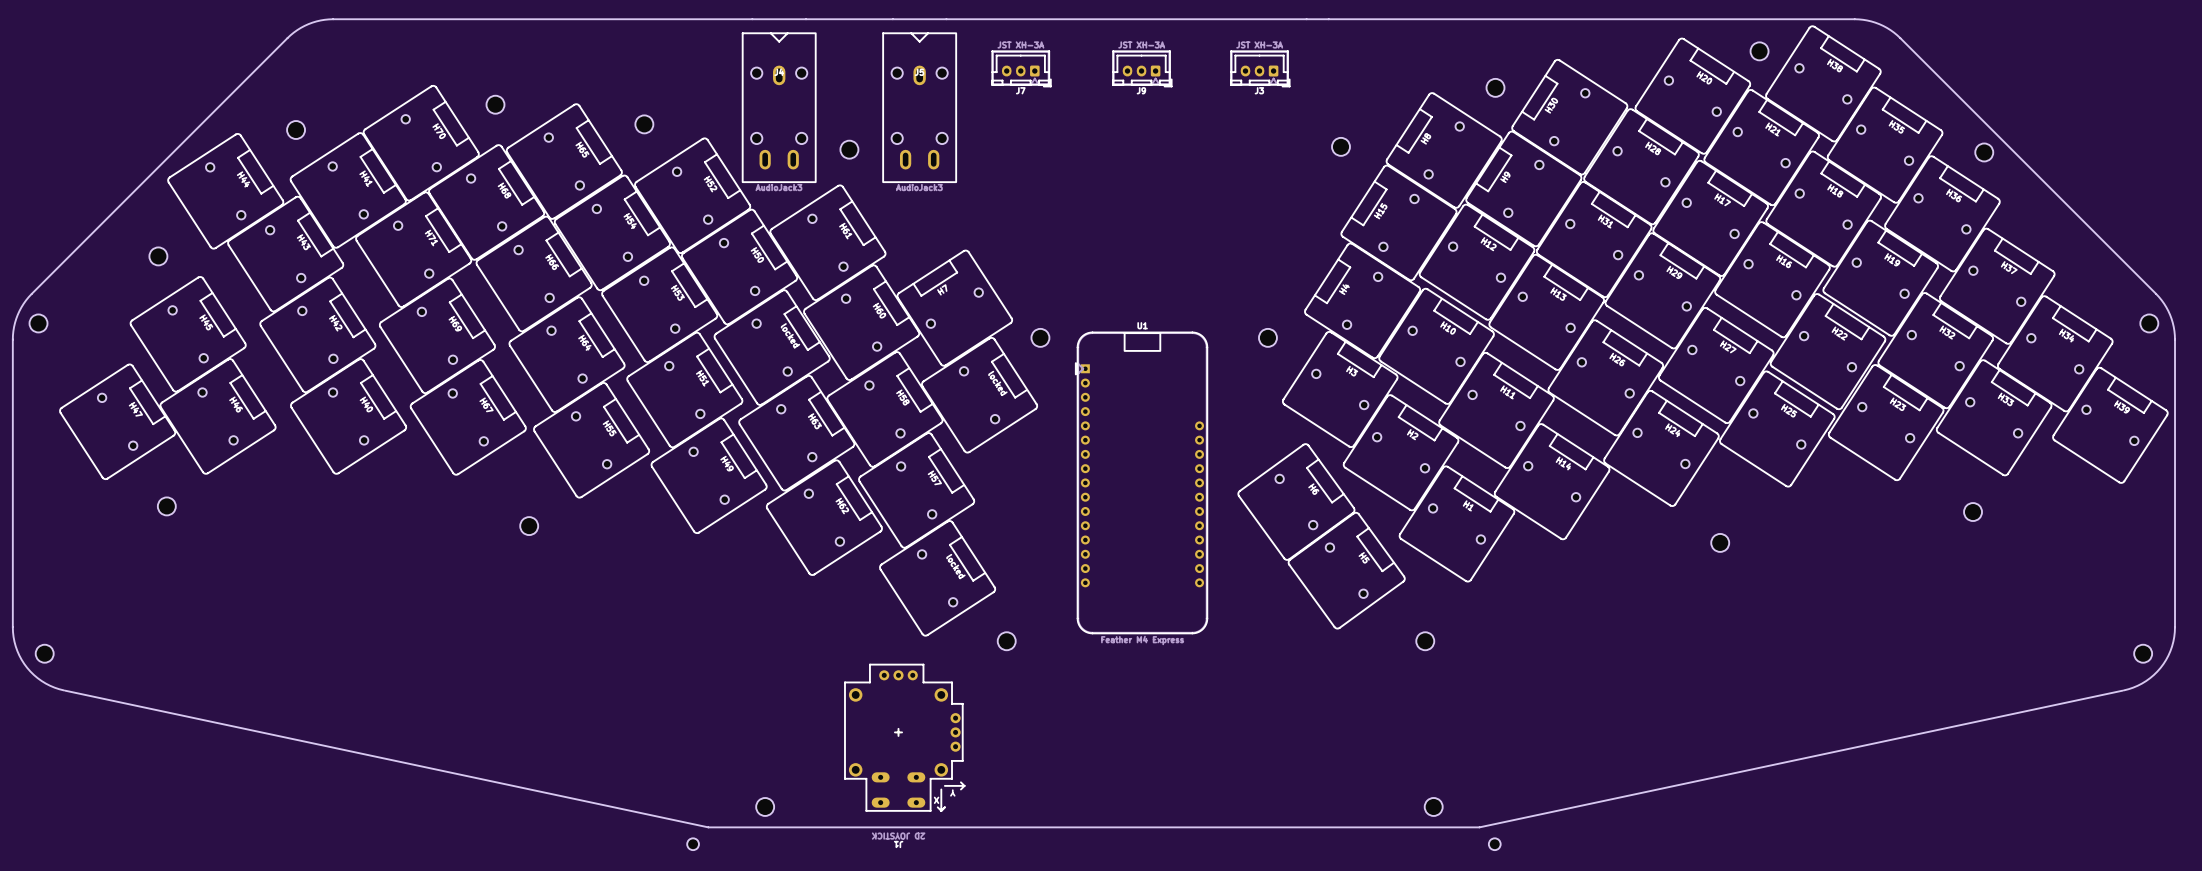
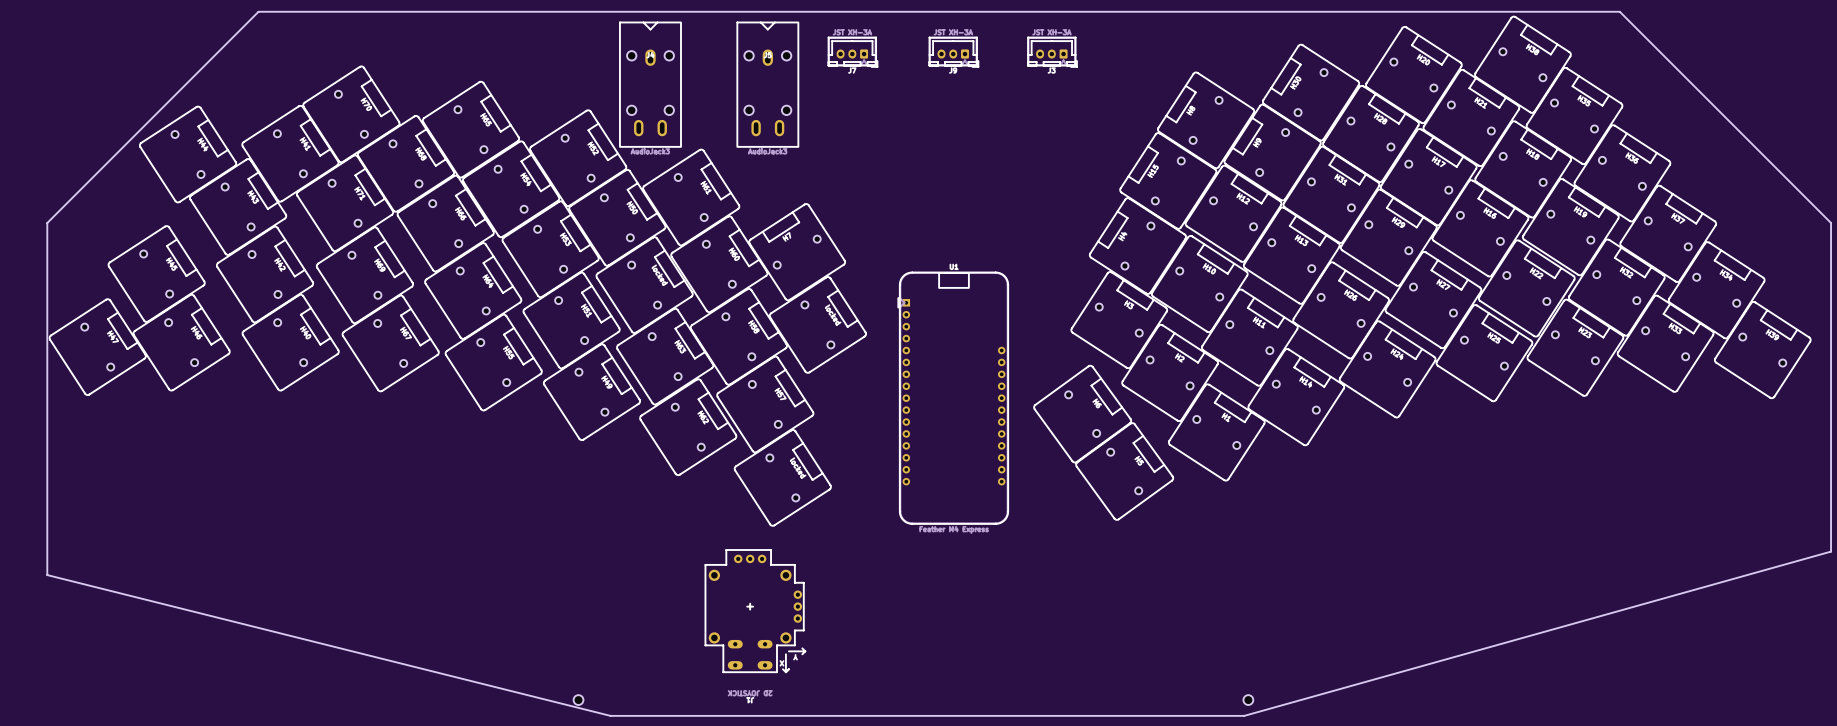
board edge: none -> (1619, 11) (1831, 223) (1831, 551) (1244, 715) (610, 715) (47, 575) (47, 223) (258, 11) (1619, 11)
part: (1759, 51) -> none
part: (1495, 87) -> none
part: (495, 104) -> none
part: (644, 124) -> none
part: (296, 130) -> none
part: (1341, 146) -> none
part: (849, 149) -> none
part: (1984, 152) -> none
part: (158, 256) -> none
part: (38, 323) -> none
part: (2149, 323) -> none
part: (1040, 337) -> none
part: (1267, 337) -> none
part: (166, 506) -> none
part: (1973, 512) -> none
part: (529, 526) -> none
part: (1720, 542) -> none
part: (1006, 641) -> none
part: (1425, 641) -> none
part: (44, 653) -> none
part: (2143, 653) -> none
board edge: (2122, 690) (1479, 827) (708, 827) (65, 690) -> none
board edge: (2123, 690) (2142, 683) (2157, 671) (2168, 655) (2174, 636) (2175, 339) (2170, 314) (2156, 293) (1900, 38) (1879, 24) (1854, 19) (333, 19) (312, 22) (300, 27) (287, 38) (31, 293) (23, 303) (16, 318) (12, 339) (13, 636) (19, 655) (30, 671) (45, 683) (64, 690) -> none
part: (765, 806) -> none
part: (1433, 806) -> none

